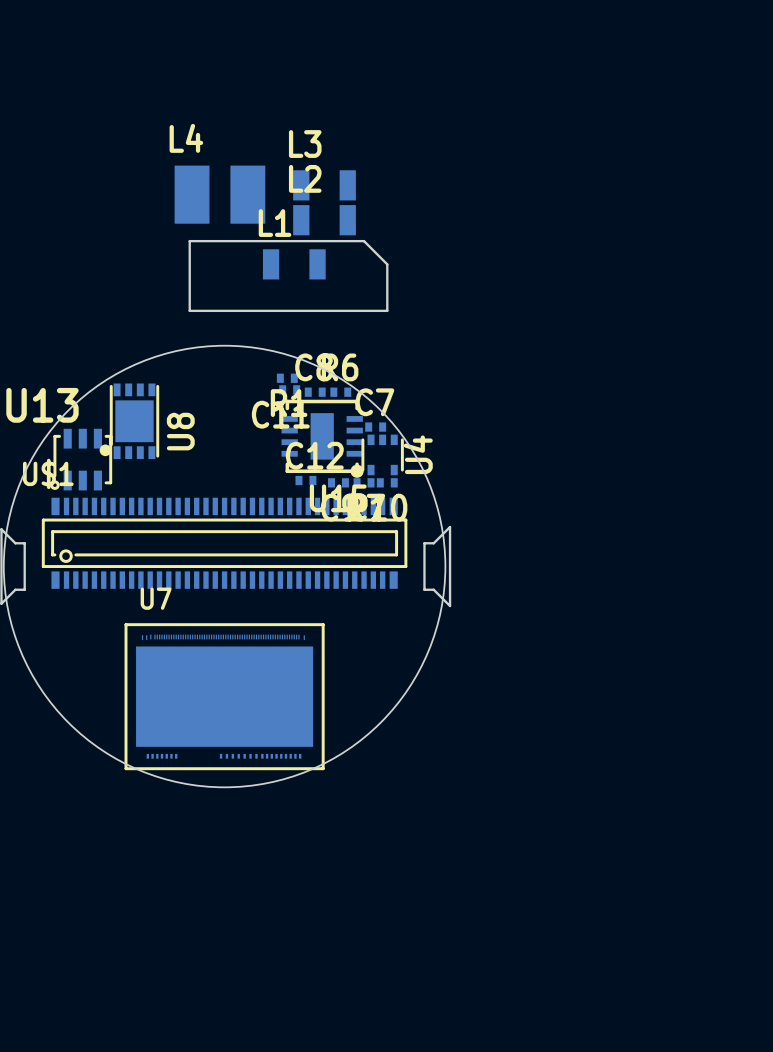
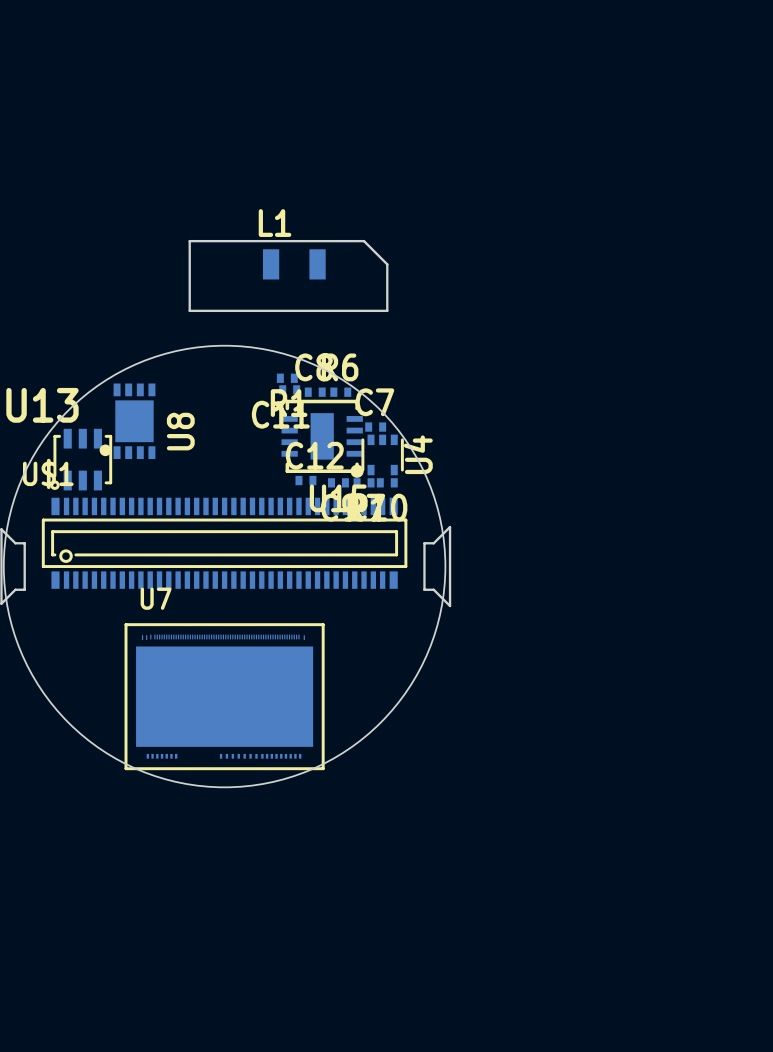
L3: (324, 185) -> none
L4: (219, 194) -> none
L2: (324, 220) -> none
U8 footprint: [99, 383, 160, 460] -> [99, 383, 156, 460]

